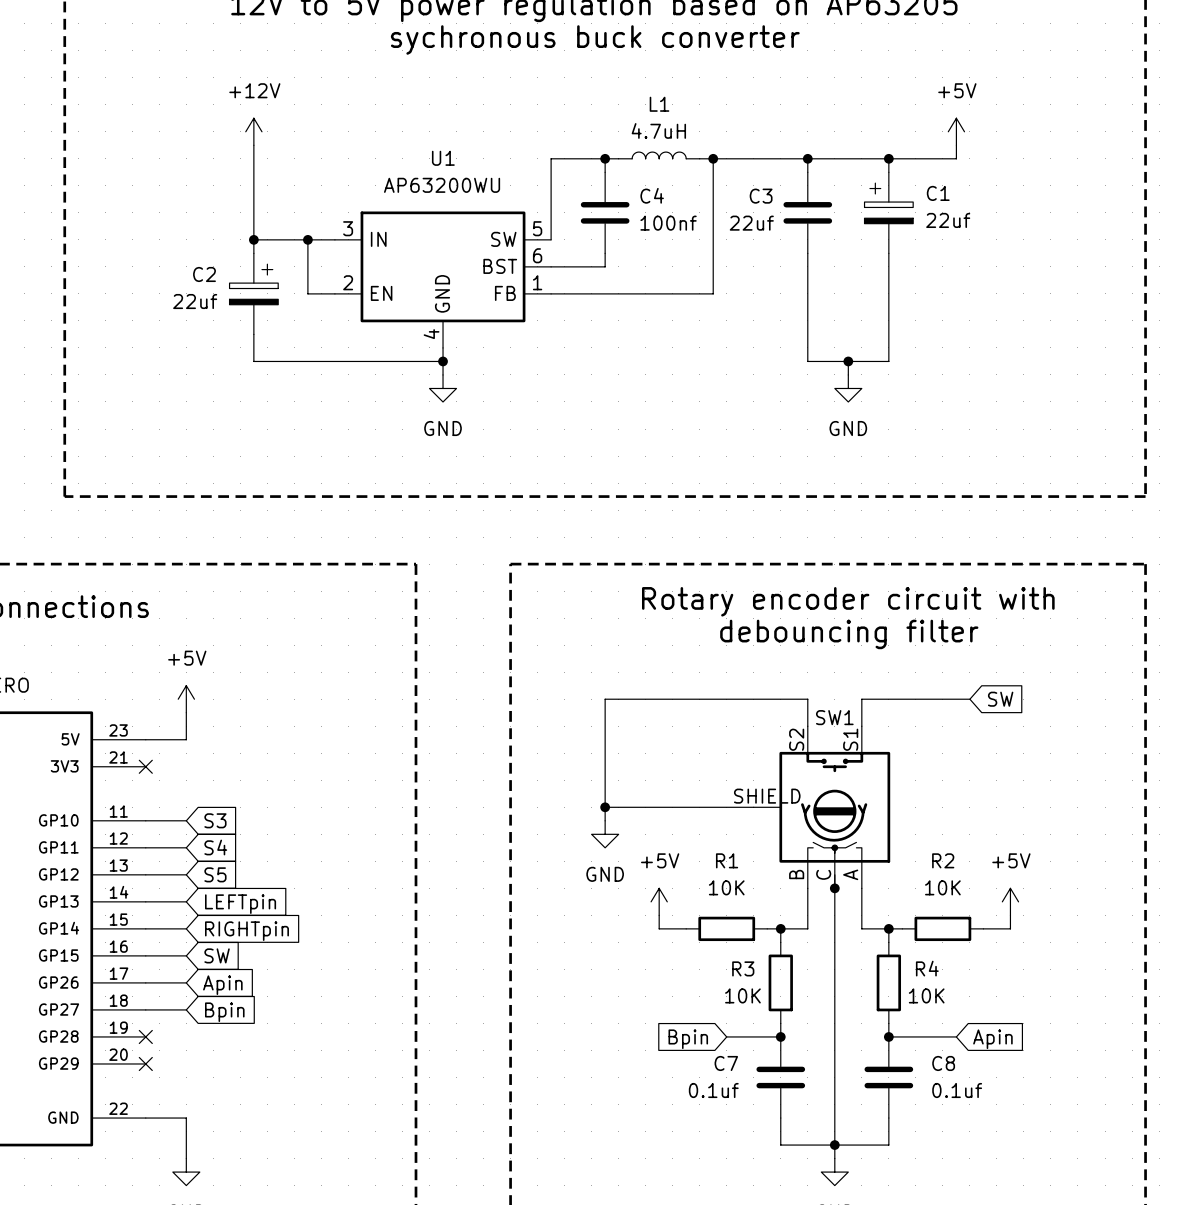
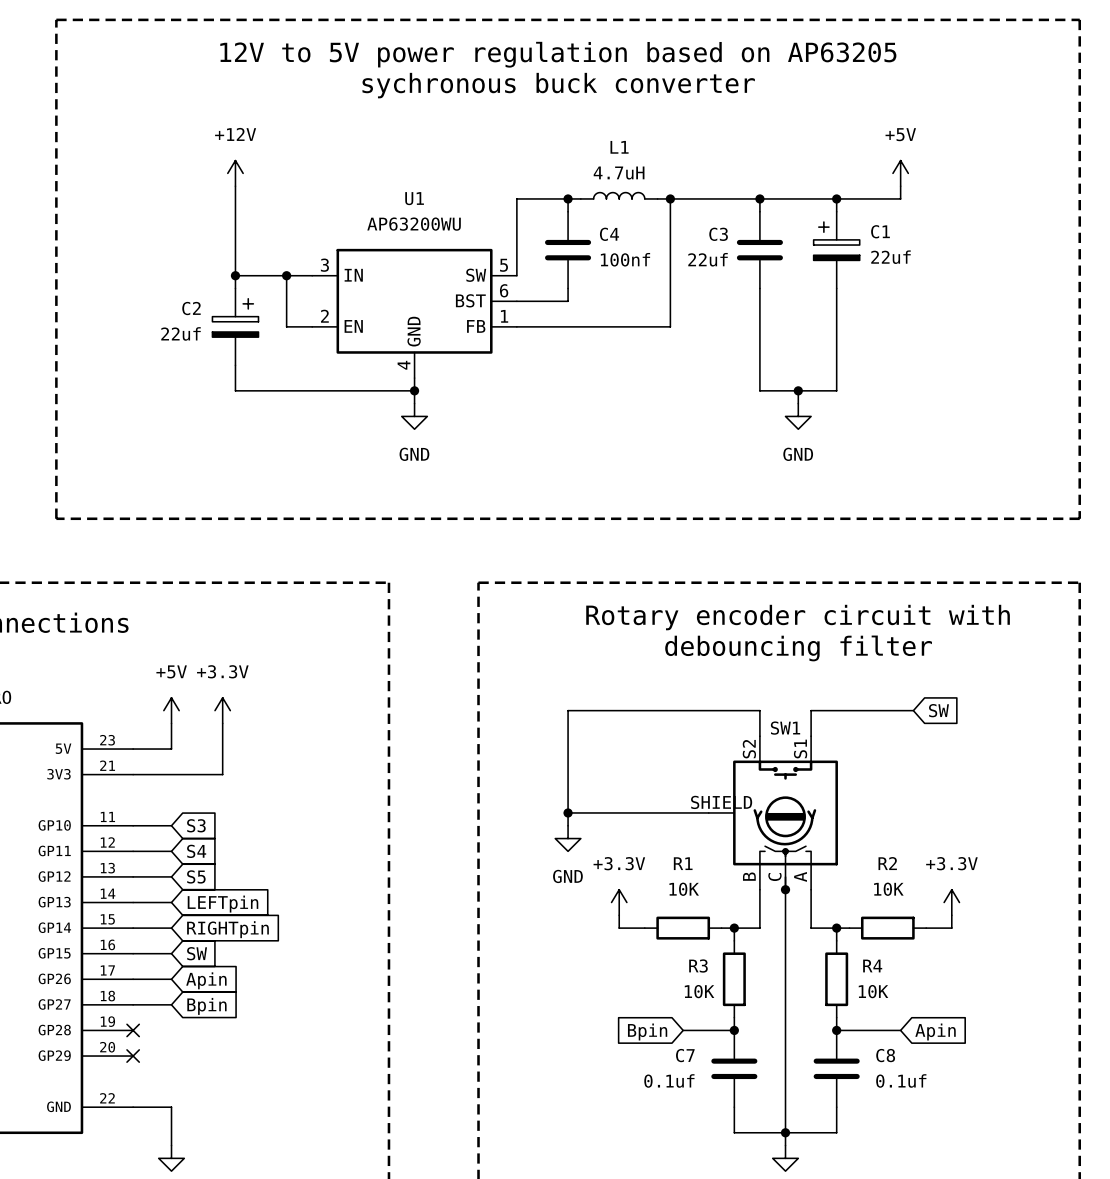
power symbol: none -> +3.3V (222, 710)
wire: none -> (222, 723) (222, 774) (133, 774)
no-connect mark: (145, 766) -> none
power symbol: +5V (659, 901) -> +3.3V (619, 902)
power symbol: +5V (1010, 901) -> +3.3V (951, 902)

